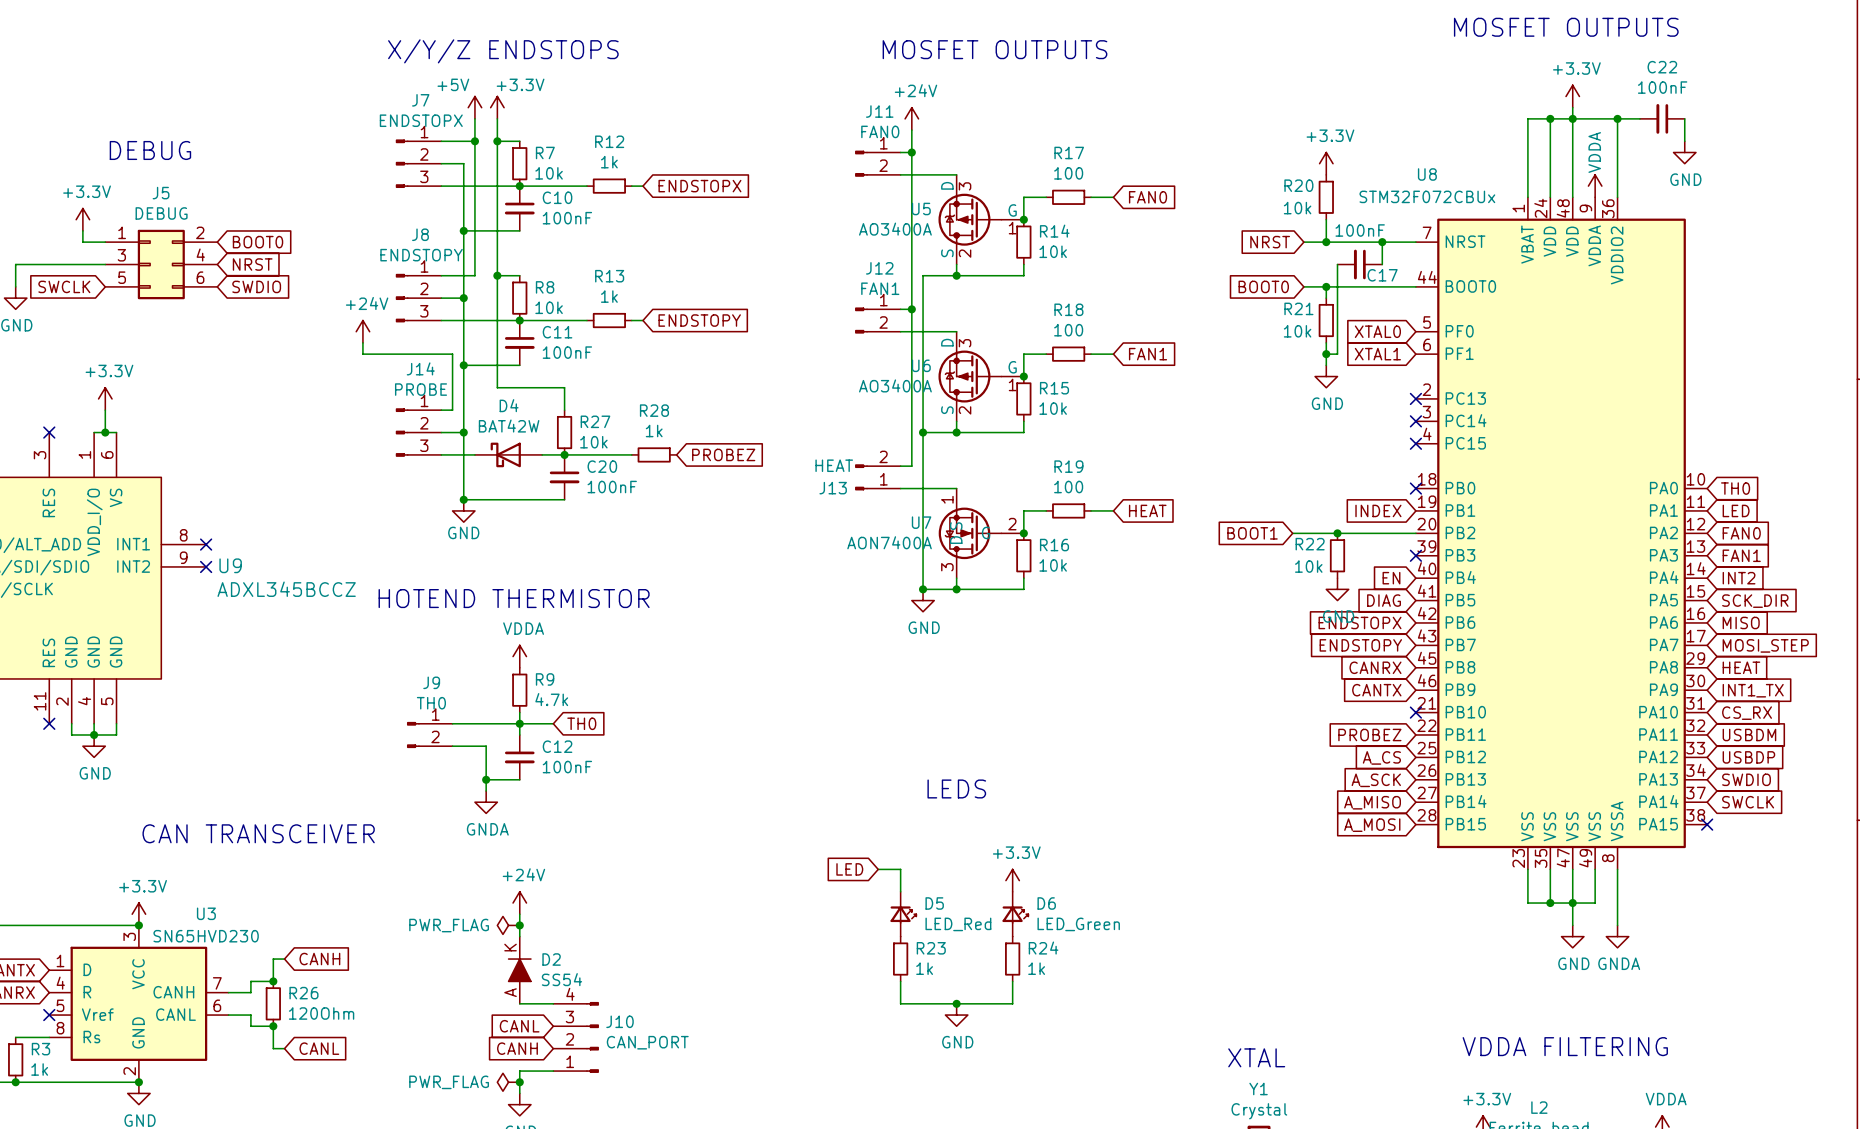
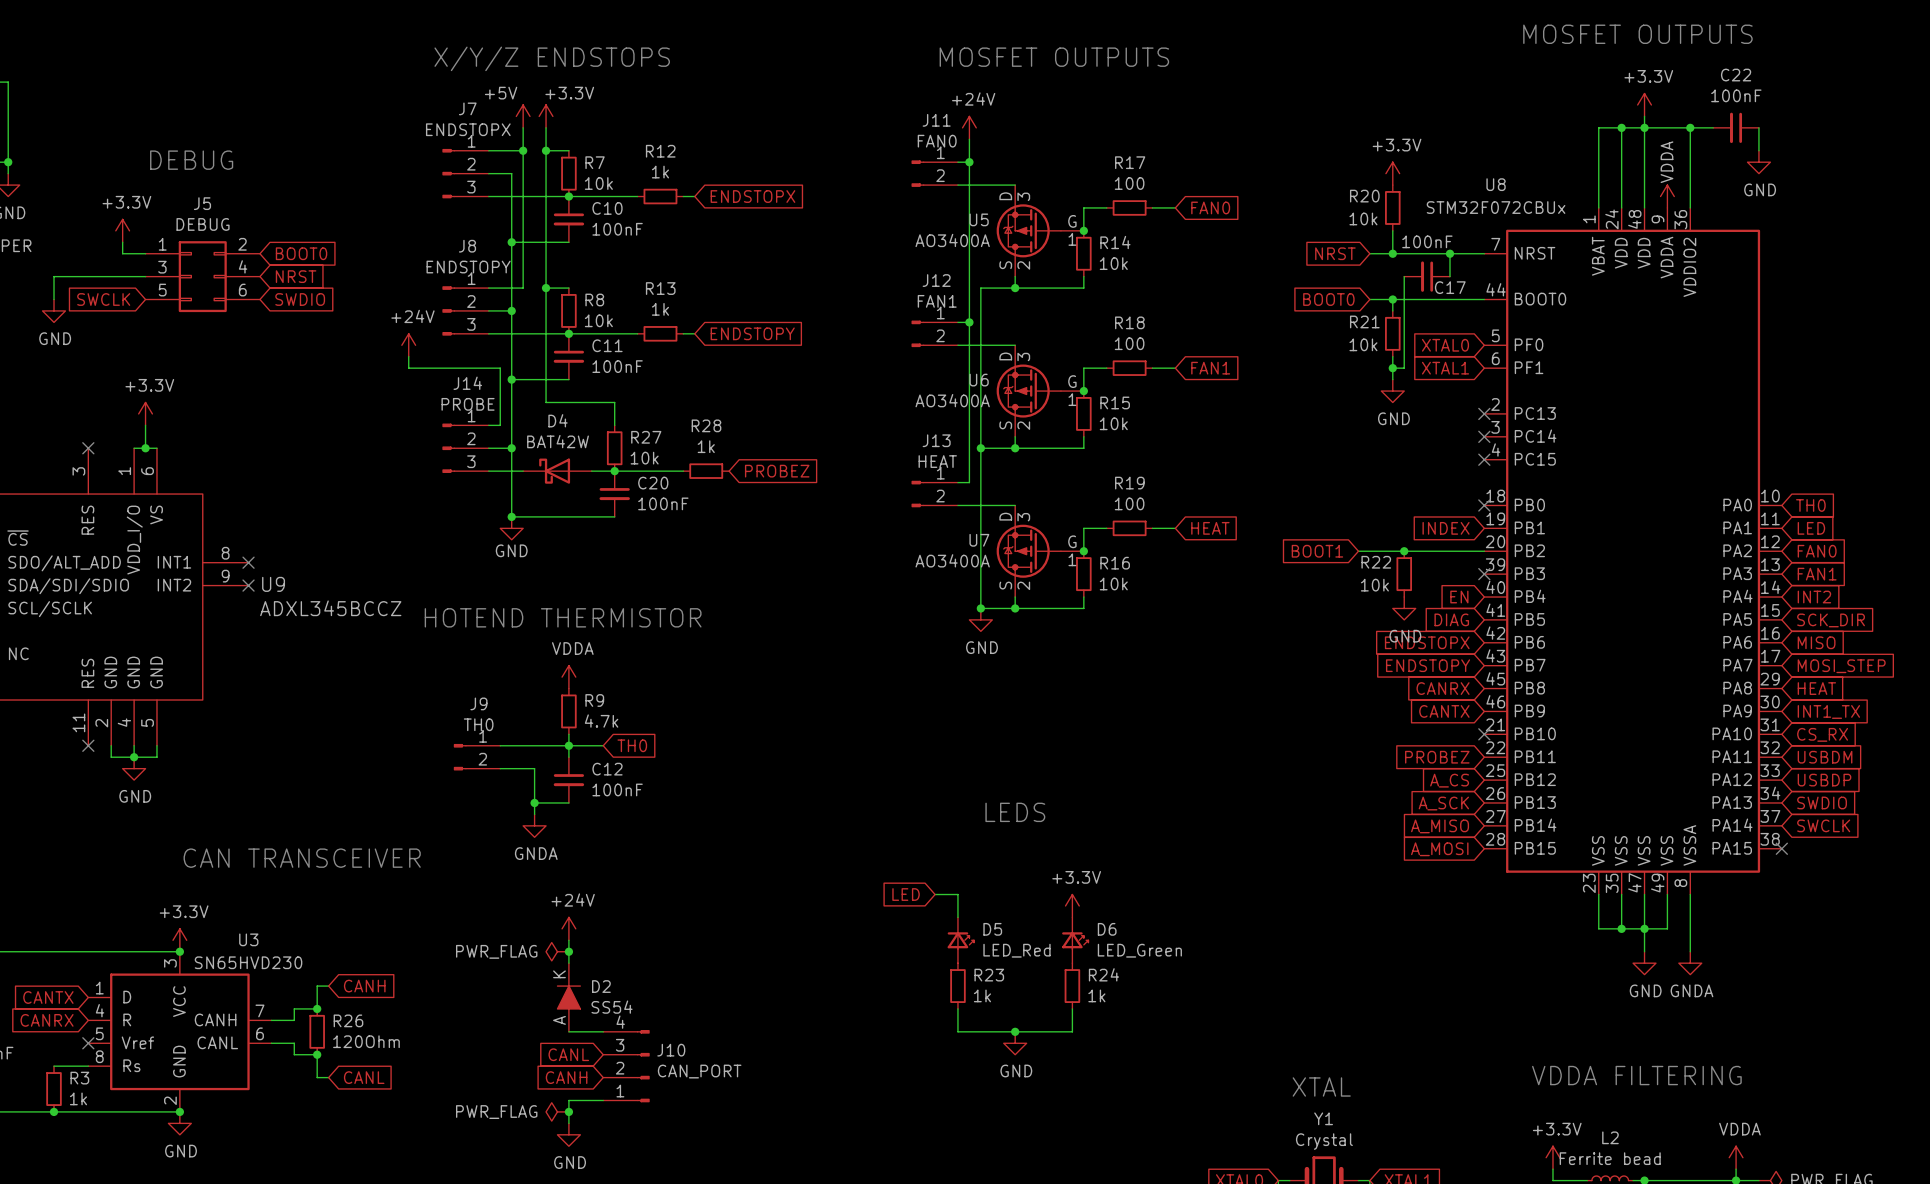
J13 value position: HEAT (834, 465) -> HEAT (937, 461)
J13 flip: as is (861, 477) -> up-down (917, 494)
J13 name position: J13 (833, 488) -> J13 (936, 440)
U7 symbol: [938, 488, 1024, 579] -> [996, 505, 1084, 598]
U7 value: AON7400A (889, 542) -> AO3400A (952, 560)

